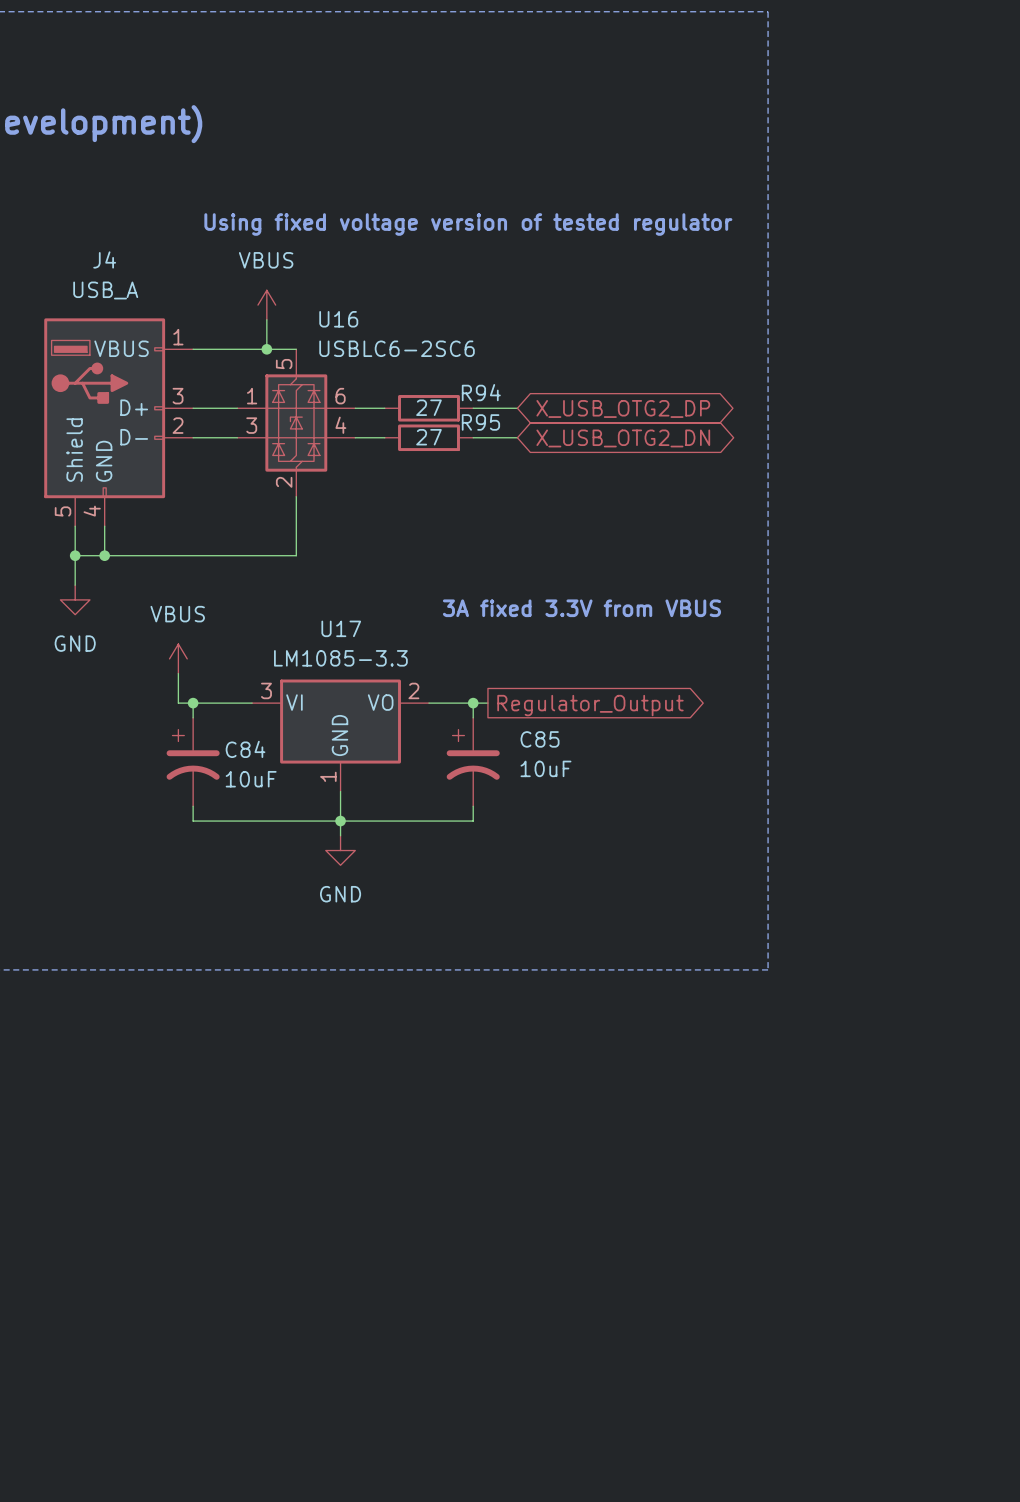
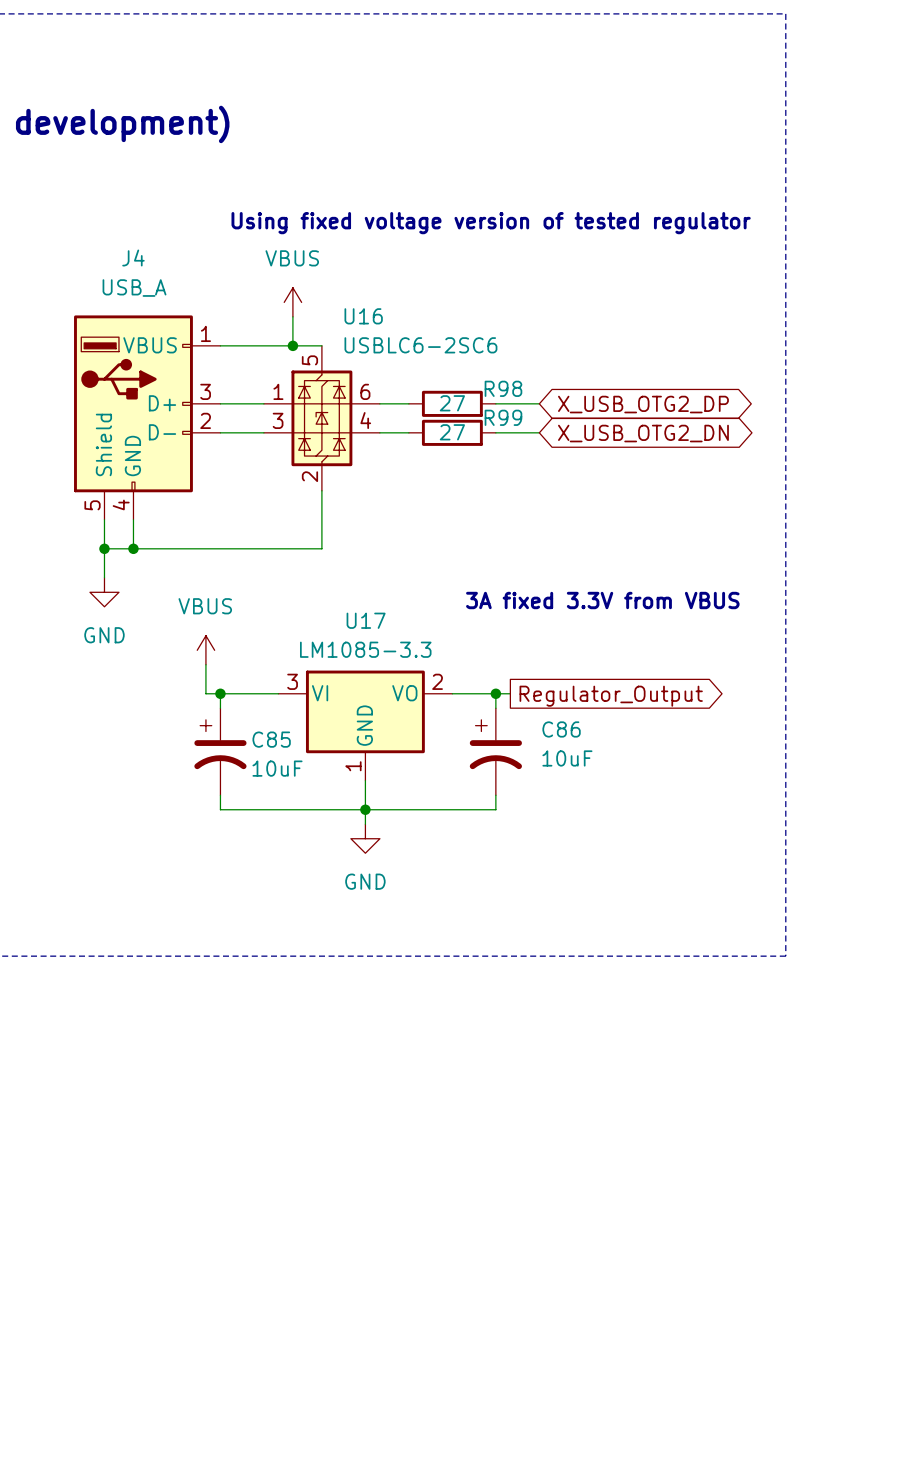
R94 name: R94 (481, 392) -> R98 (503, 388)
R95 name: R95 (480, 422) -> R99 (503, 417)
C85 name: C85 (540, 739) -> C86 (561, 729)
C84 name: C84 (245, 749) -> C85 (271, 739)

